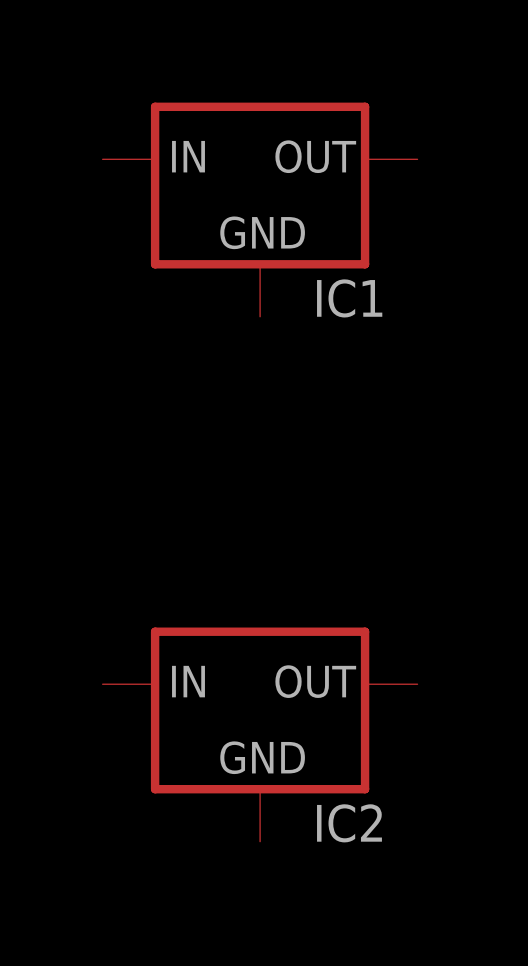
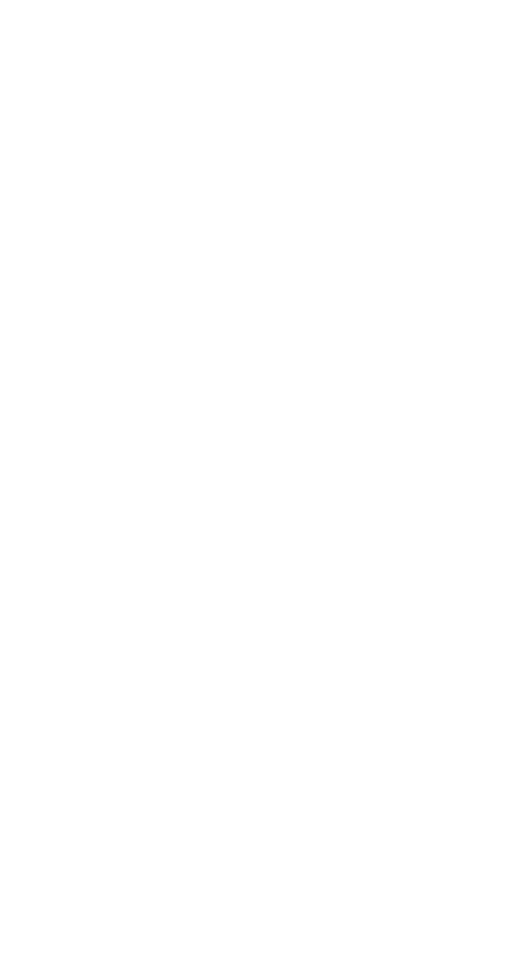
IC1: (260, 209) -> none
IC2: (260, 734) -> none

